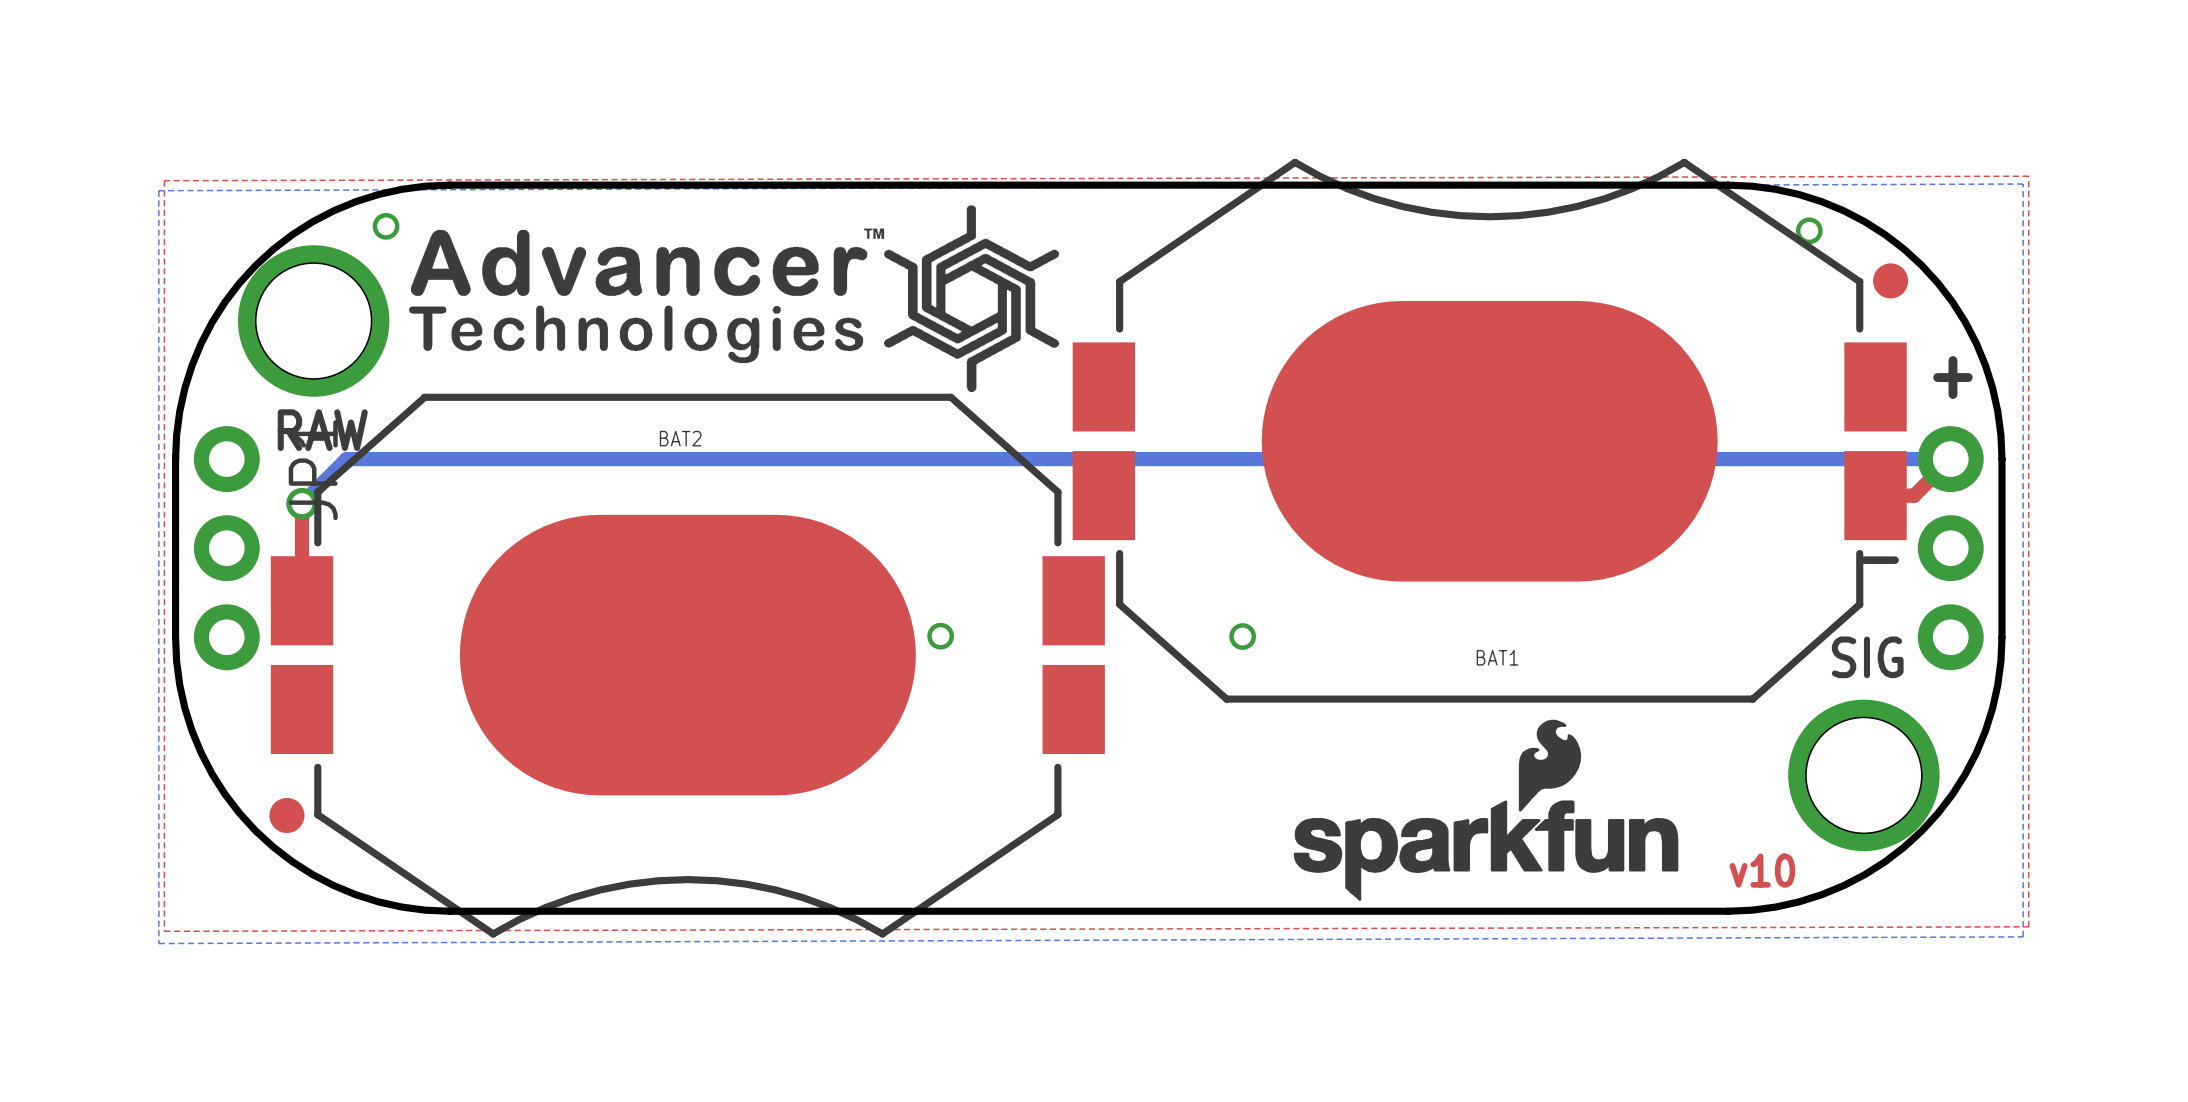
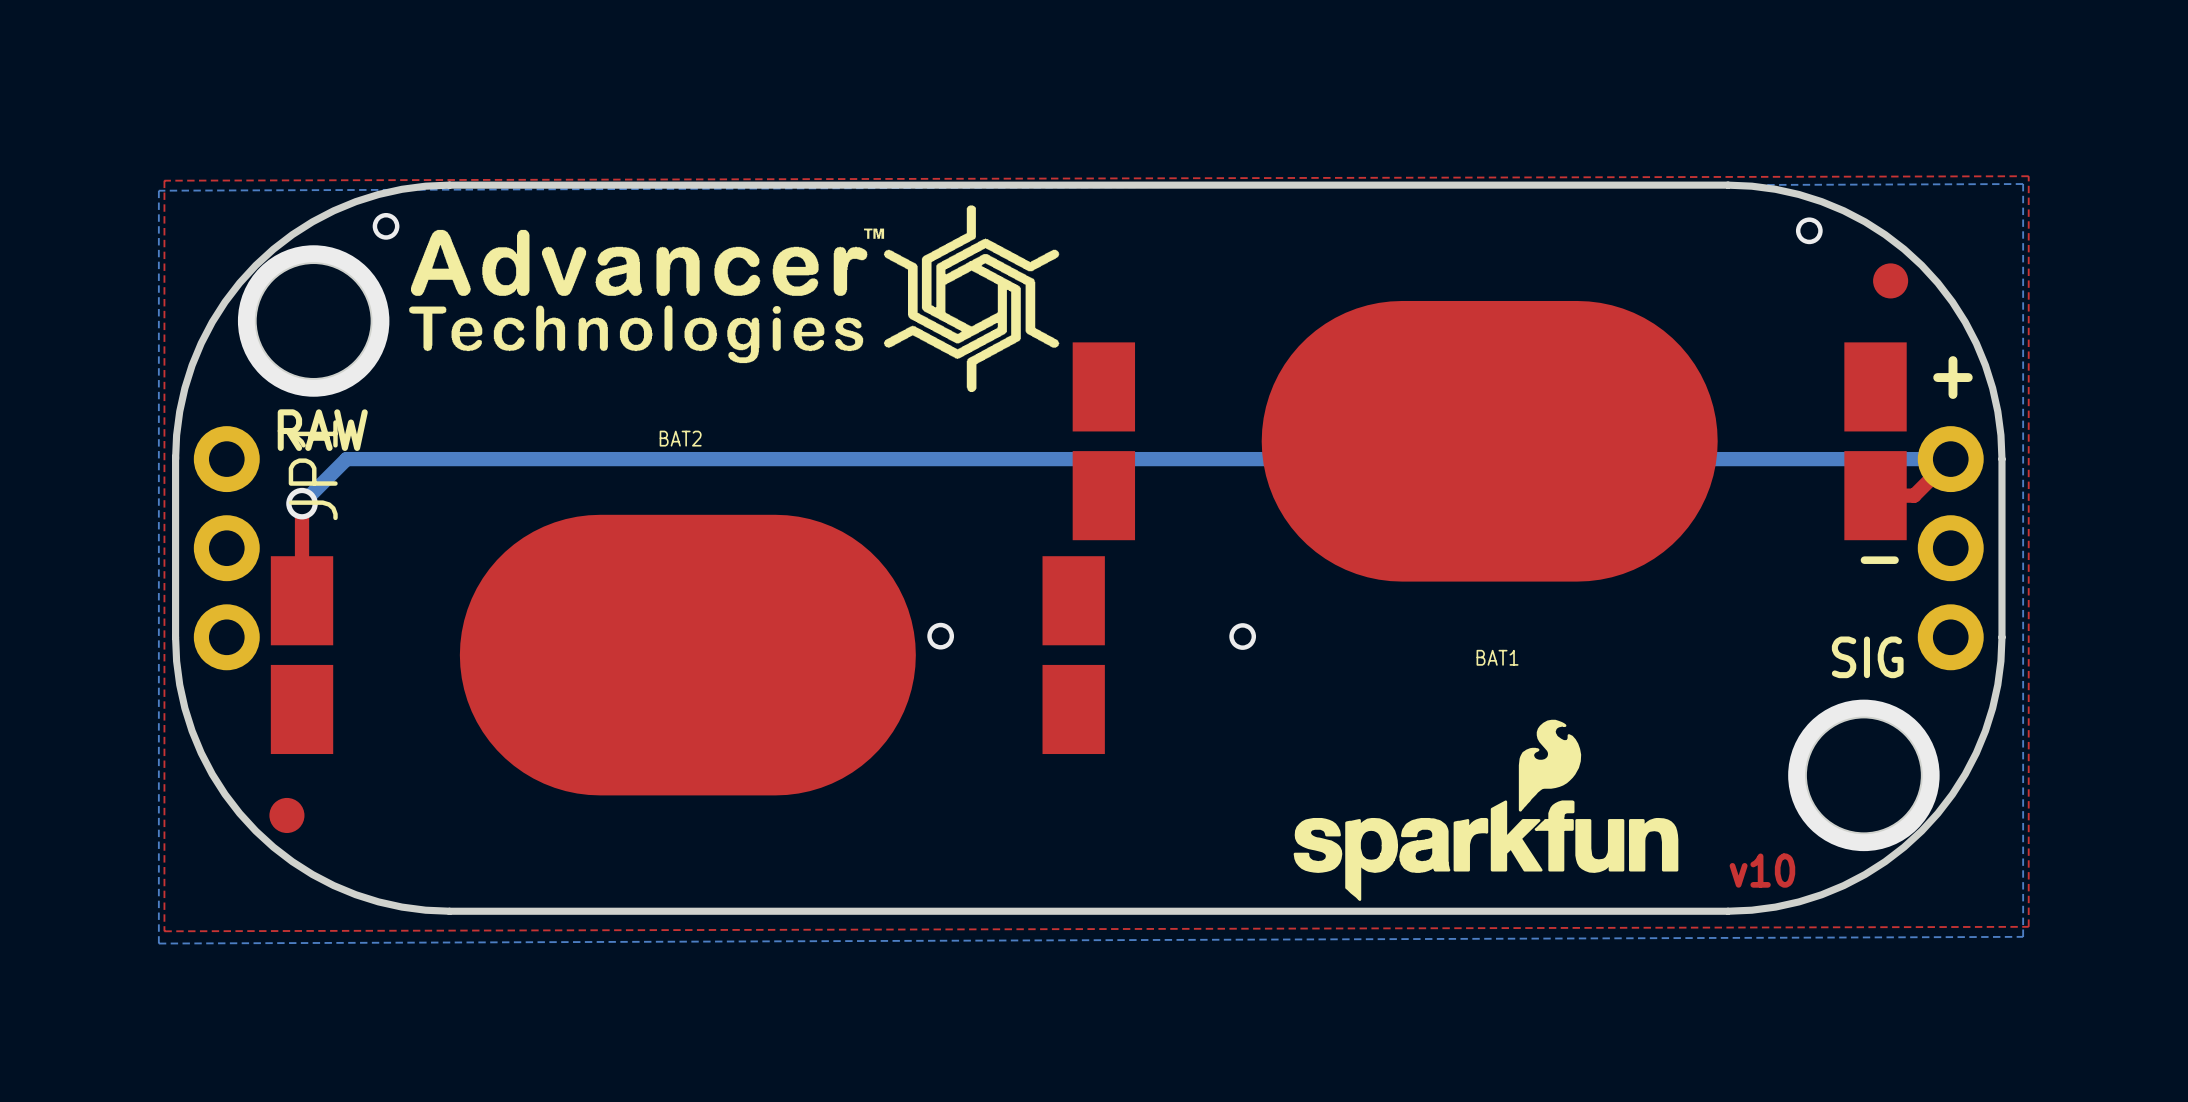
BAT1 footprint: [1072, 158, 1907, 703] -> [1072, 300, 1907, 582]
BAT2 footprint: [270, 393, 1105, 938] -> [270, 514, 1105, 796]

